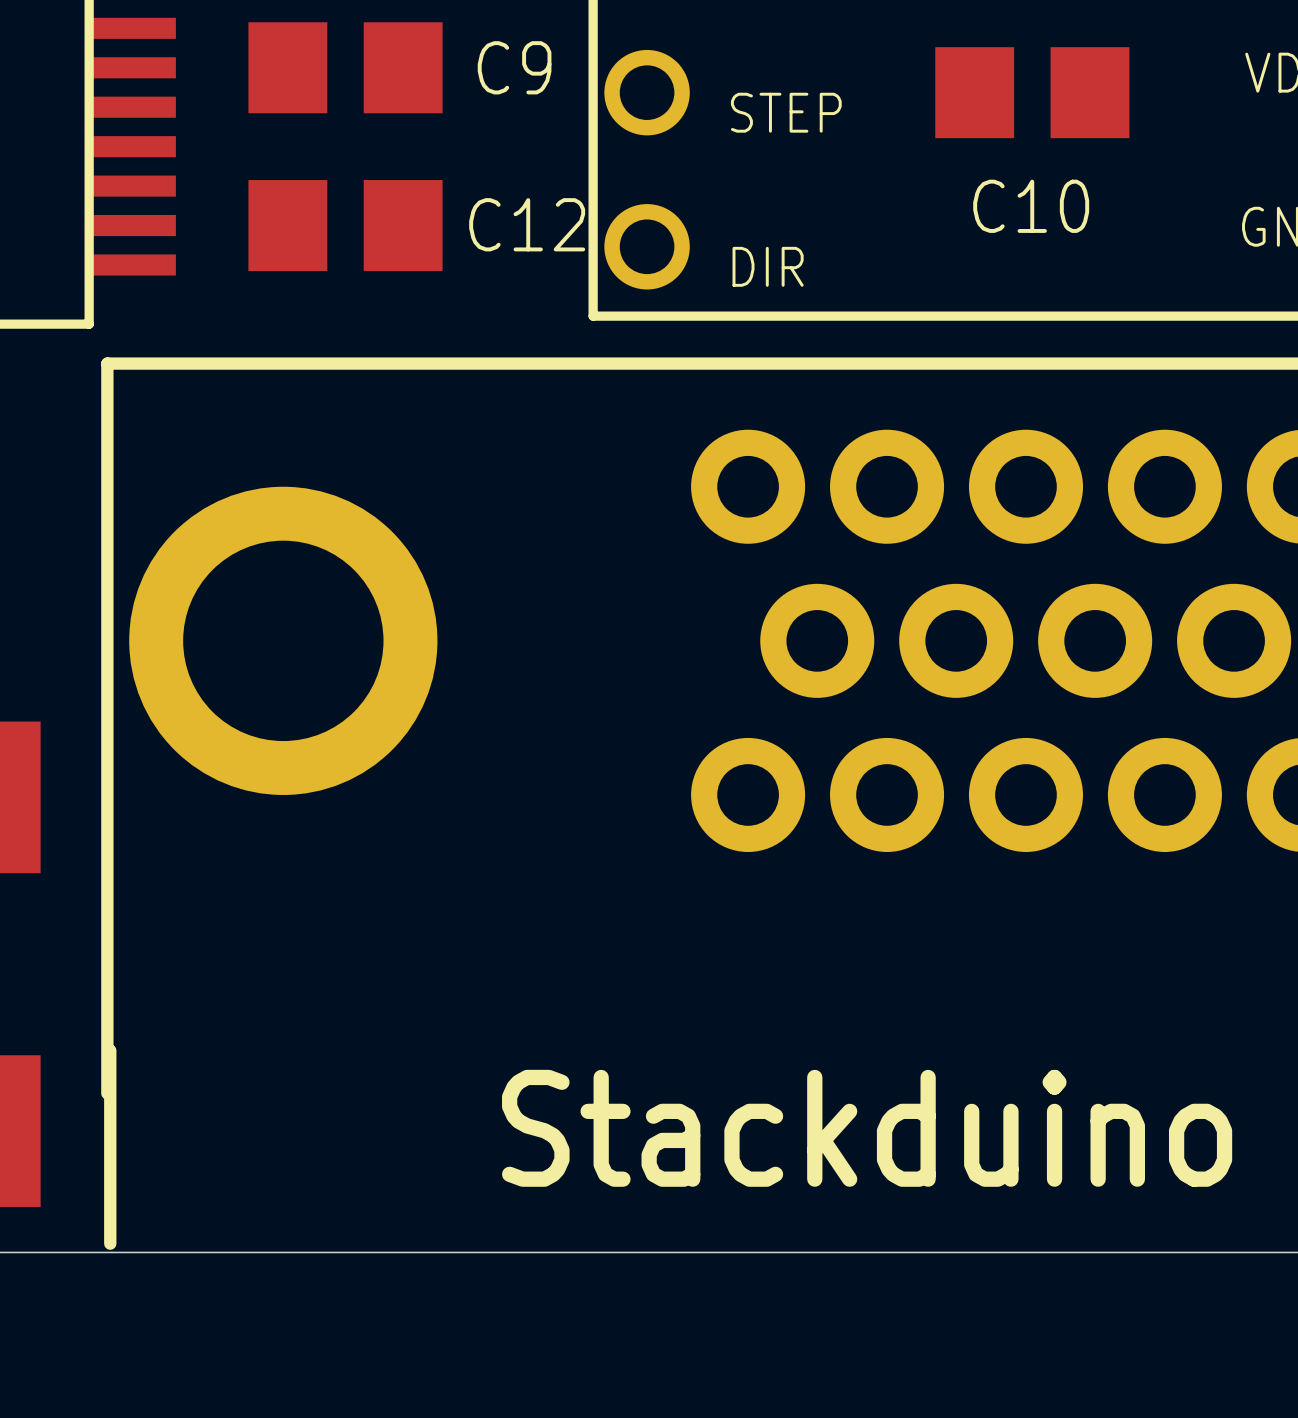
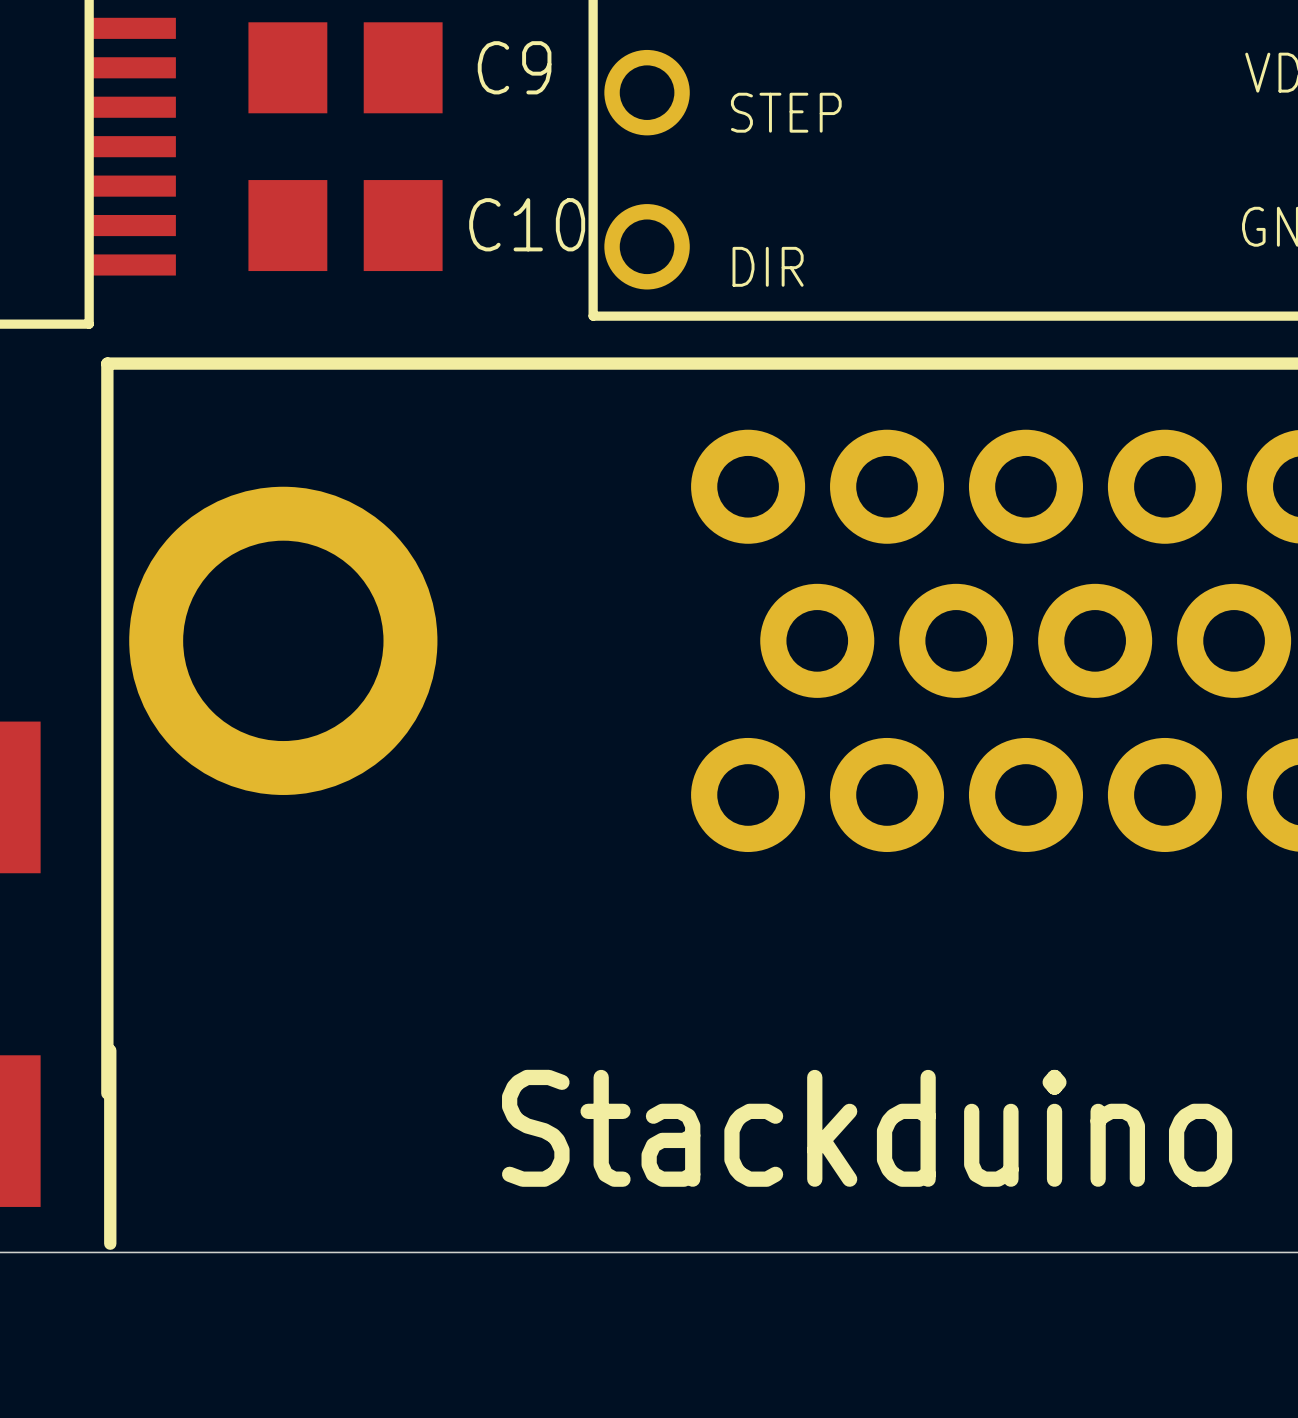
C10: (1032, 92) -> none
C12 name: C12 (527, 224) -> C10 (527, 224)

